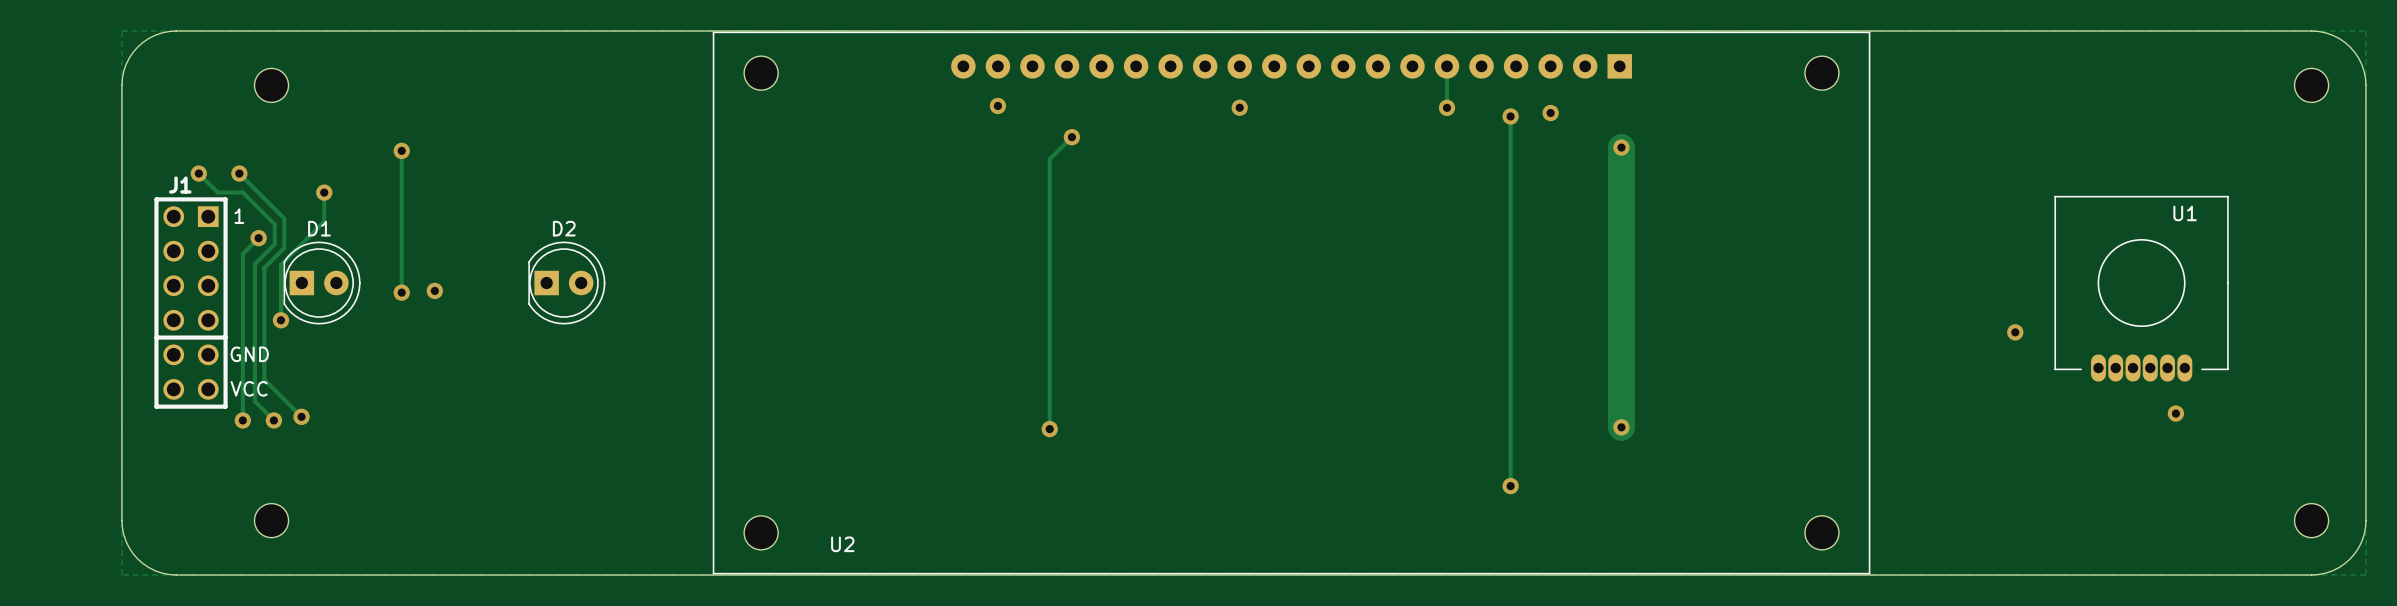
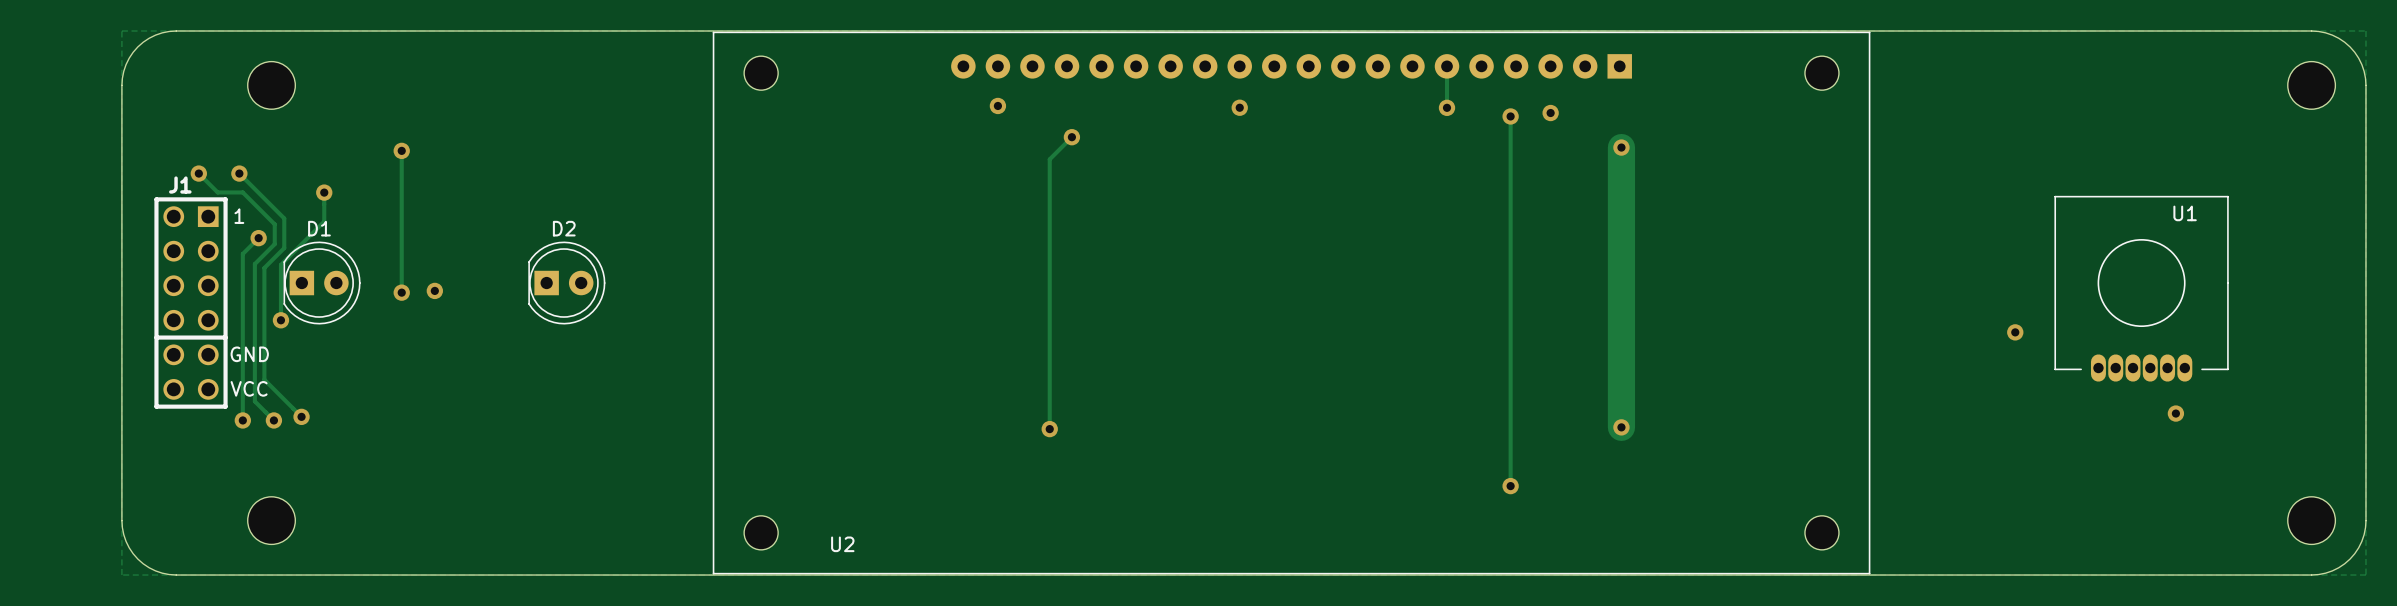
part footprint: [254, 68, 289, 103] -> [247, 61, 296, 110]
part footprint: [2294, 68, 2329, 103] -> [2287, 61, 2336, 110]
part footprint: [254, 503, 289, 538] -> [247, 496, 296, 545]
part footprint: [2294, 503, 2329, 538] -> [2287, 496, 2336, 545]

